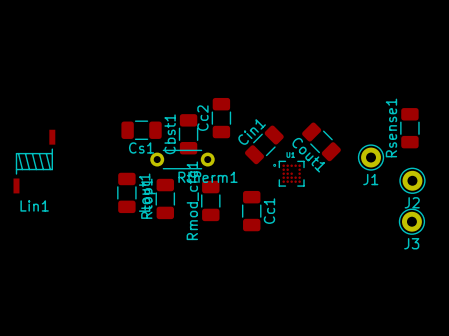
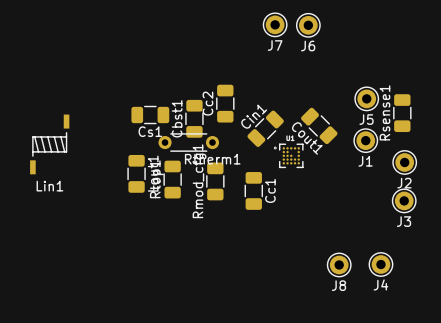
J7: none -> (275, 24)
J6: none -> (308, 25)
J5: none -> (366, 98)
J8: none -> (339, 264)
J4: none -> (380, 264)

